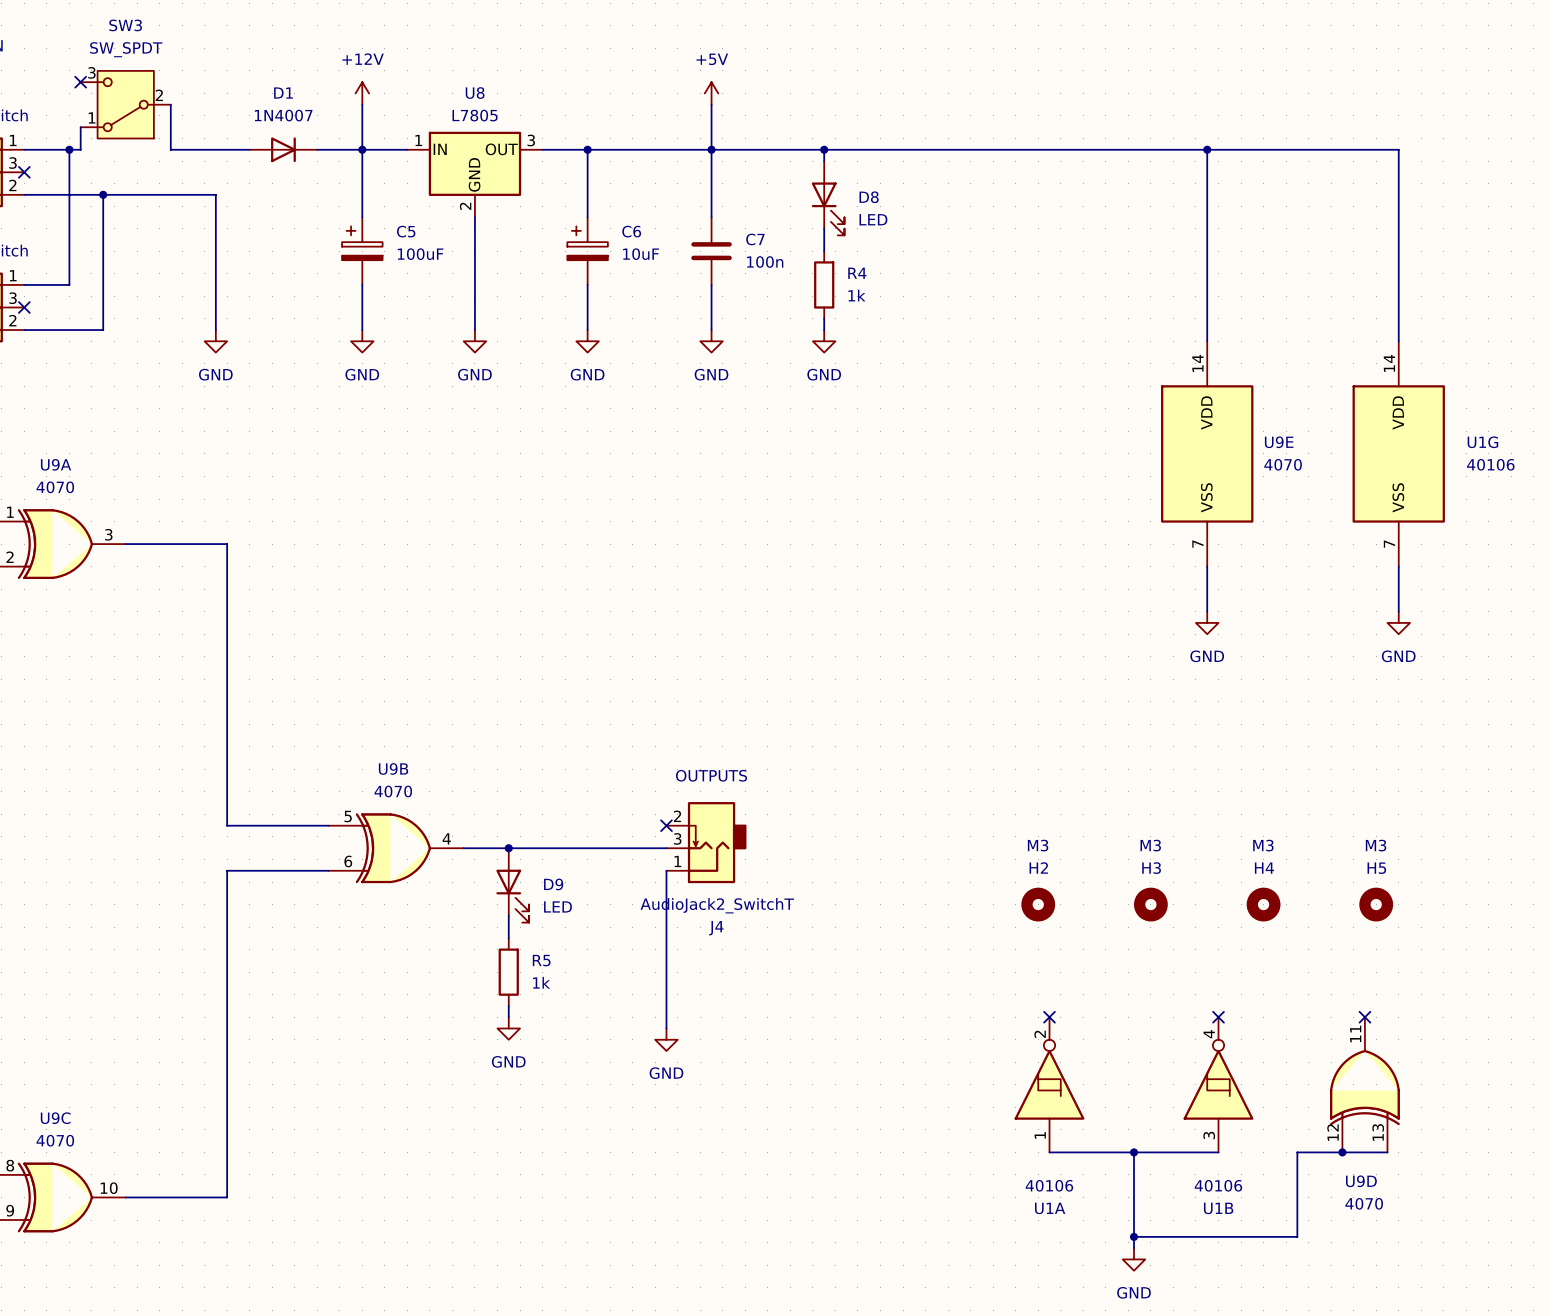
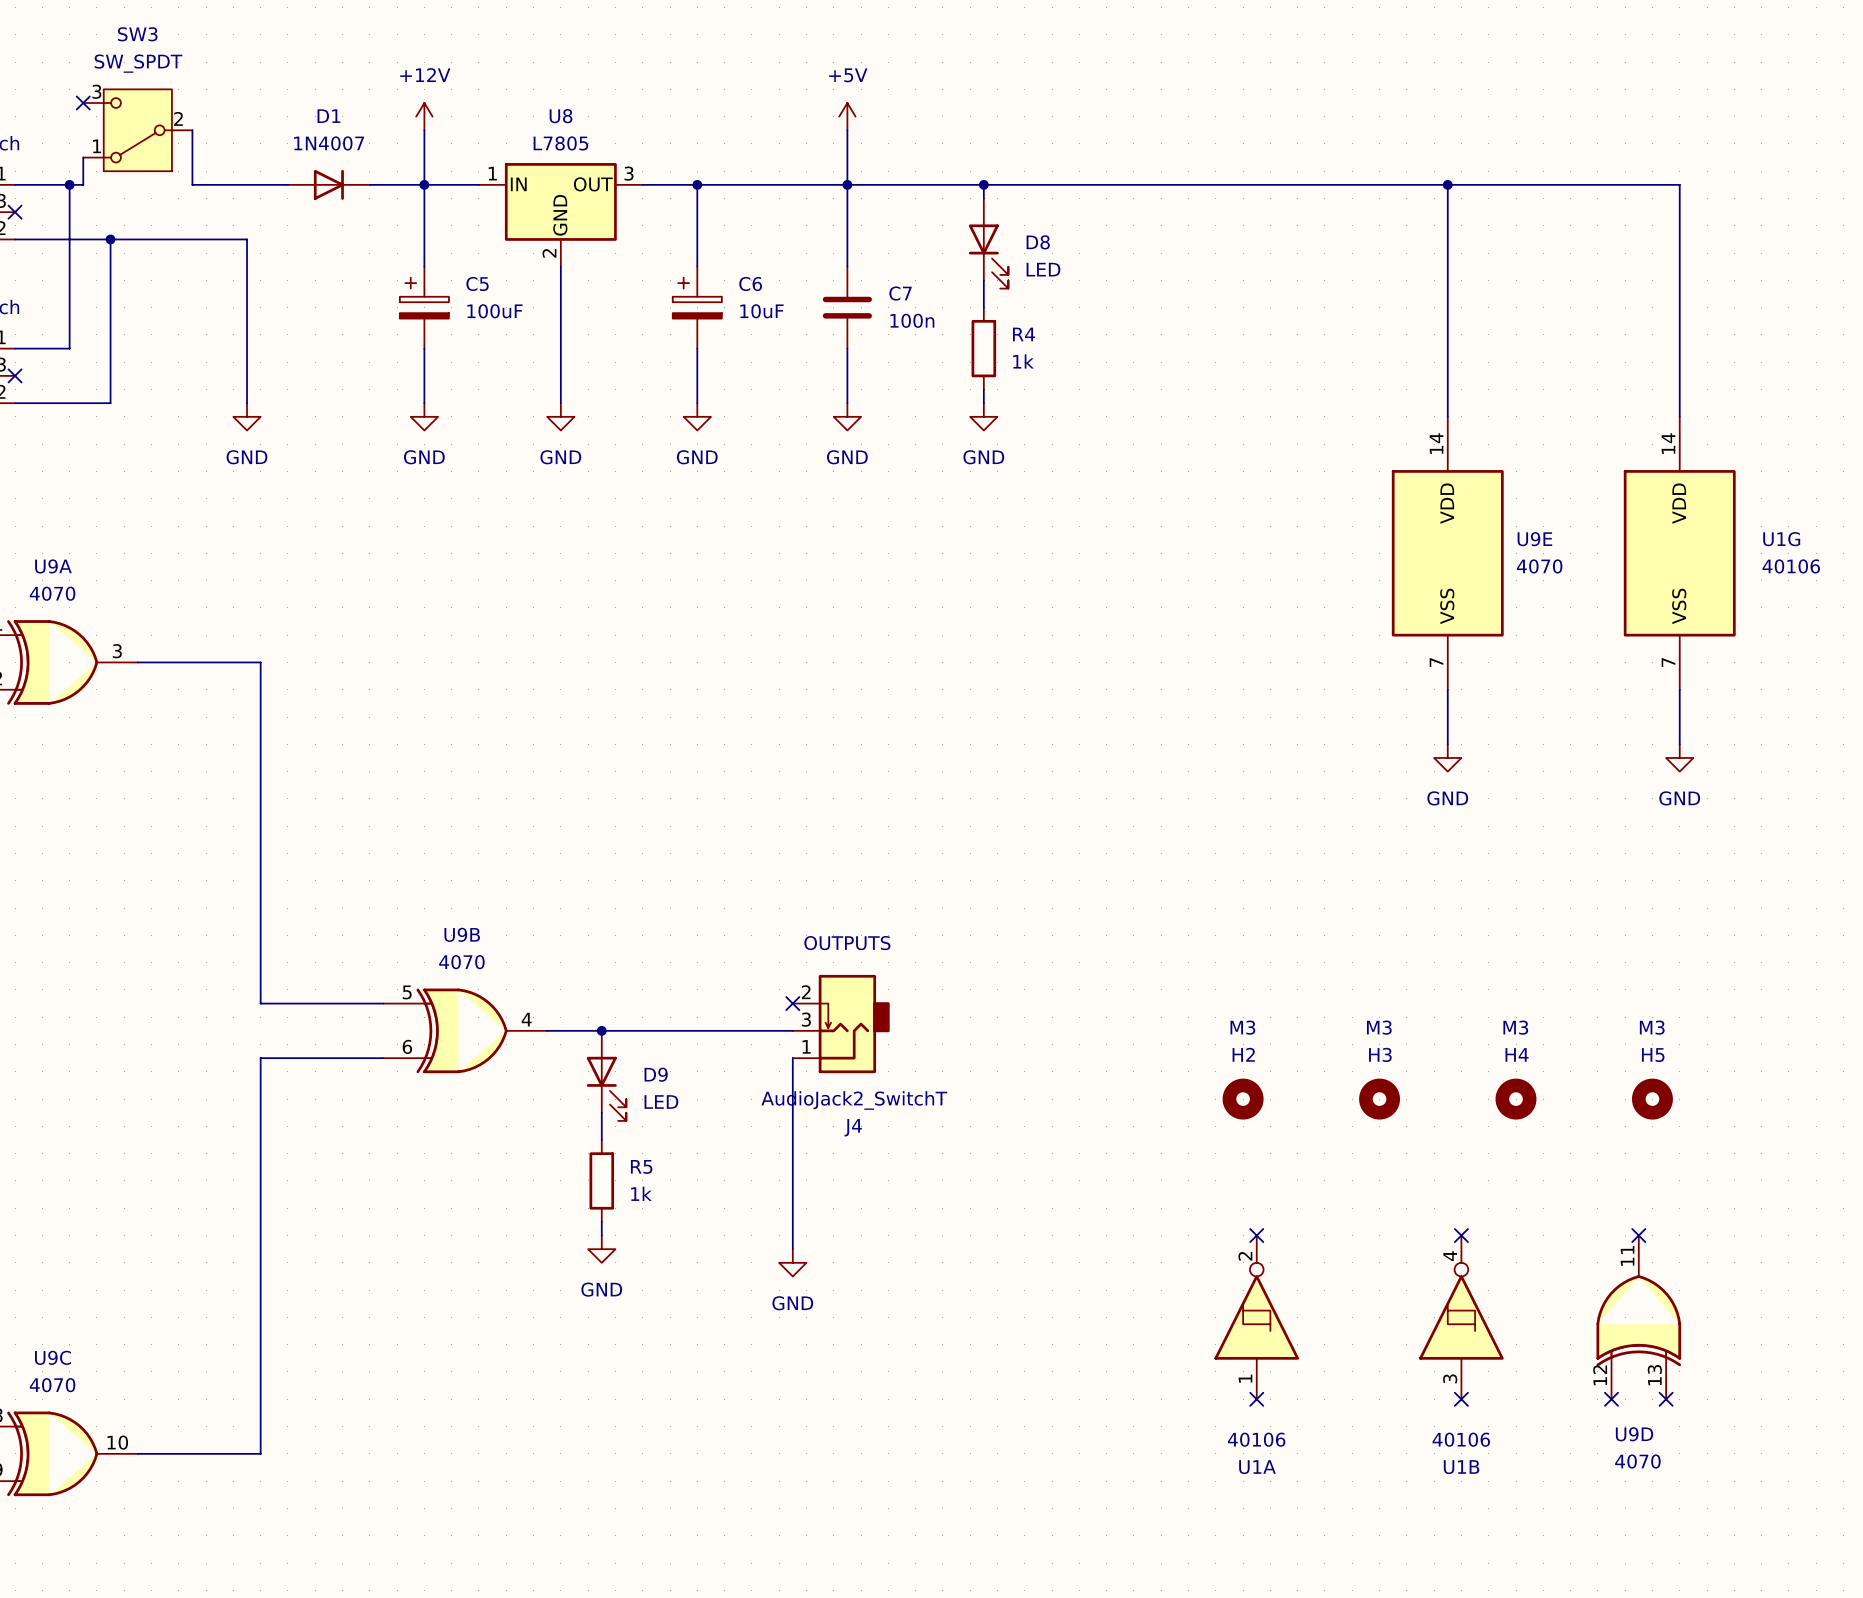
wire: (1049, 1152) (1218, 1152) -> none
no-connect mark: none -> (1256, 1399)
wire: (1134, 1152) (1134, 1248) -> none
junction: (1134, 1152) -> none
no-connect mark: none -> (1461, 1399)
junction: (1342, 1152) -> none
no-connect mark: none -> (1611, 1399)
wire: (1387, 1152) (1297, 1152) (1297, 1236) (1134, 1236) -> none
no-connect mark: none -> (1666, 1399)
junction: (1134, 1236) -> none
power symbol: GND (1134, 1259) -> none

